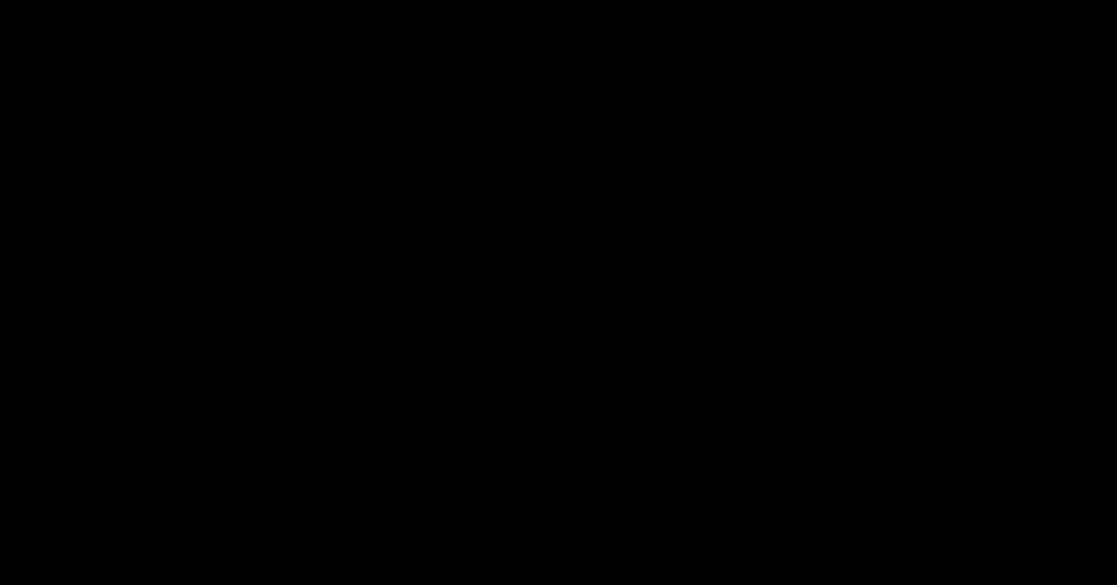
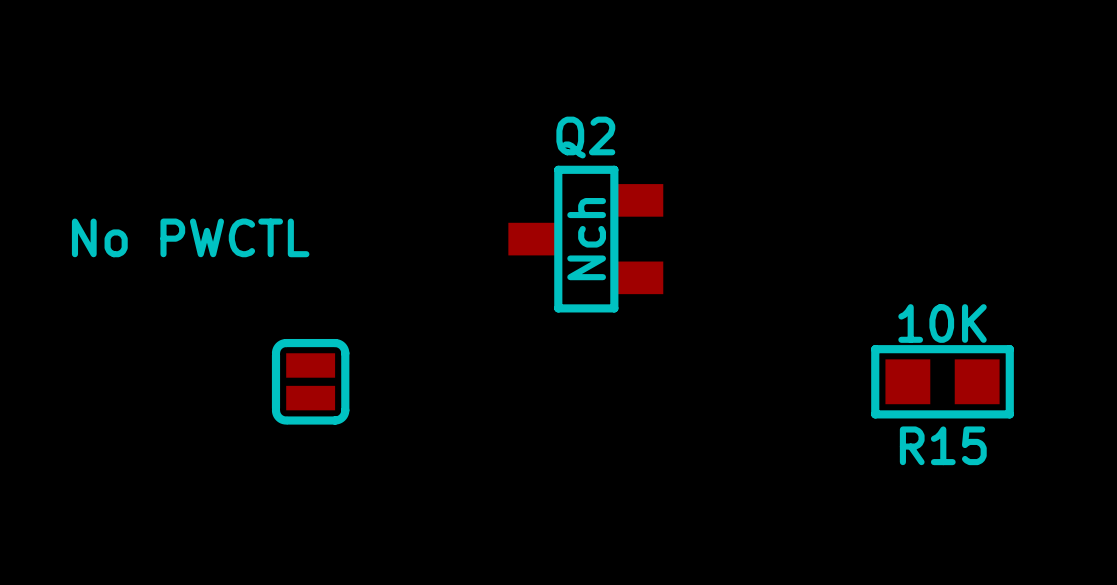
text: none -> No PWCTL (190, 237)
Q2: none -> Nch (585, 239)
part: none -> (310, 381)
R15: none -> 10K (942, 381)

